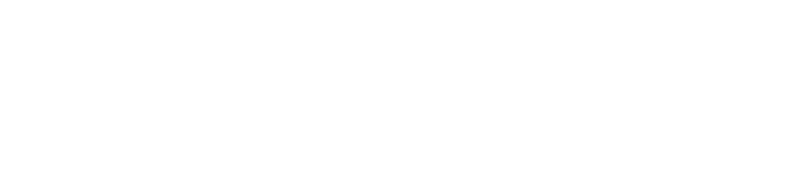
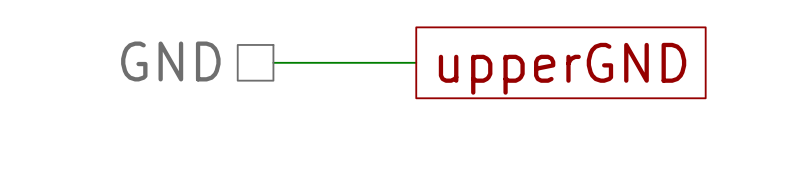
hierarchical label: none -> GND (170, 61)
wire: none -> (273, 62) (416, 62)
global label: none -> upperGND (562, 68)

